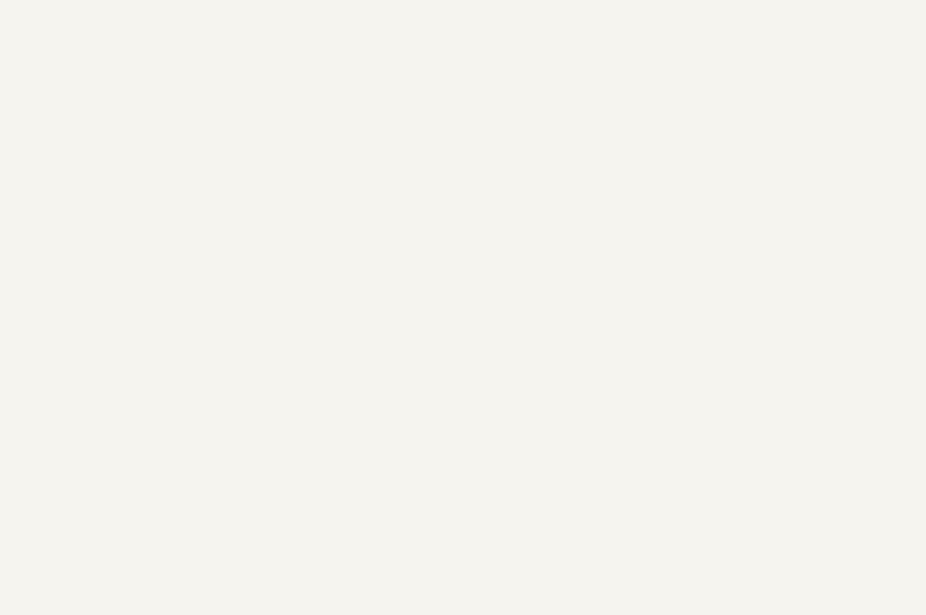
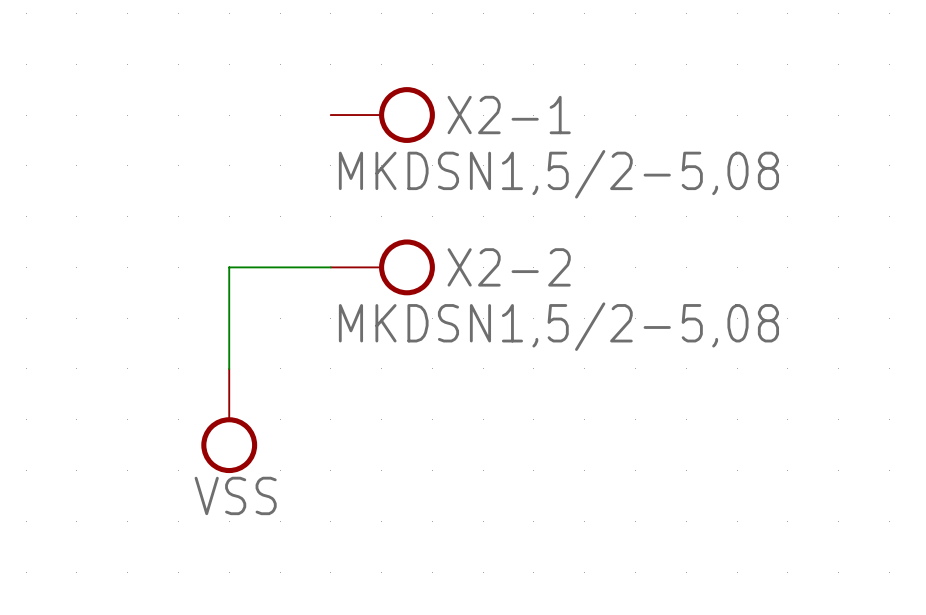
X2-1: none -> MKDSN1,5/2-5,08 (382, 115)
wire: none -> (330, 267) (229, 267) (229, 368)
X2-2: none -> MKDSN1,5/2-5,08 (382, 267)
power symbol: none -> VSS (229, 421)

